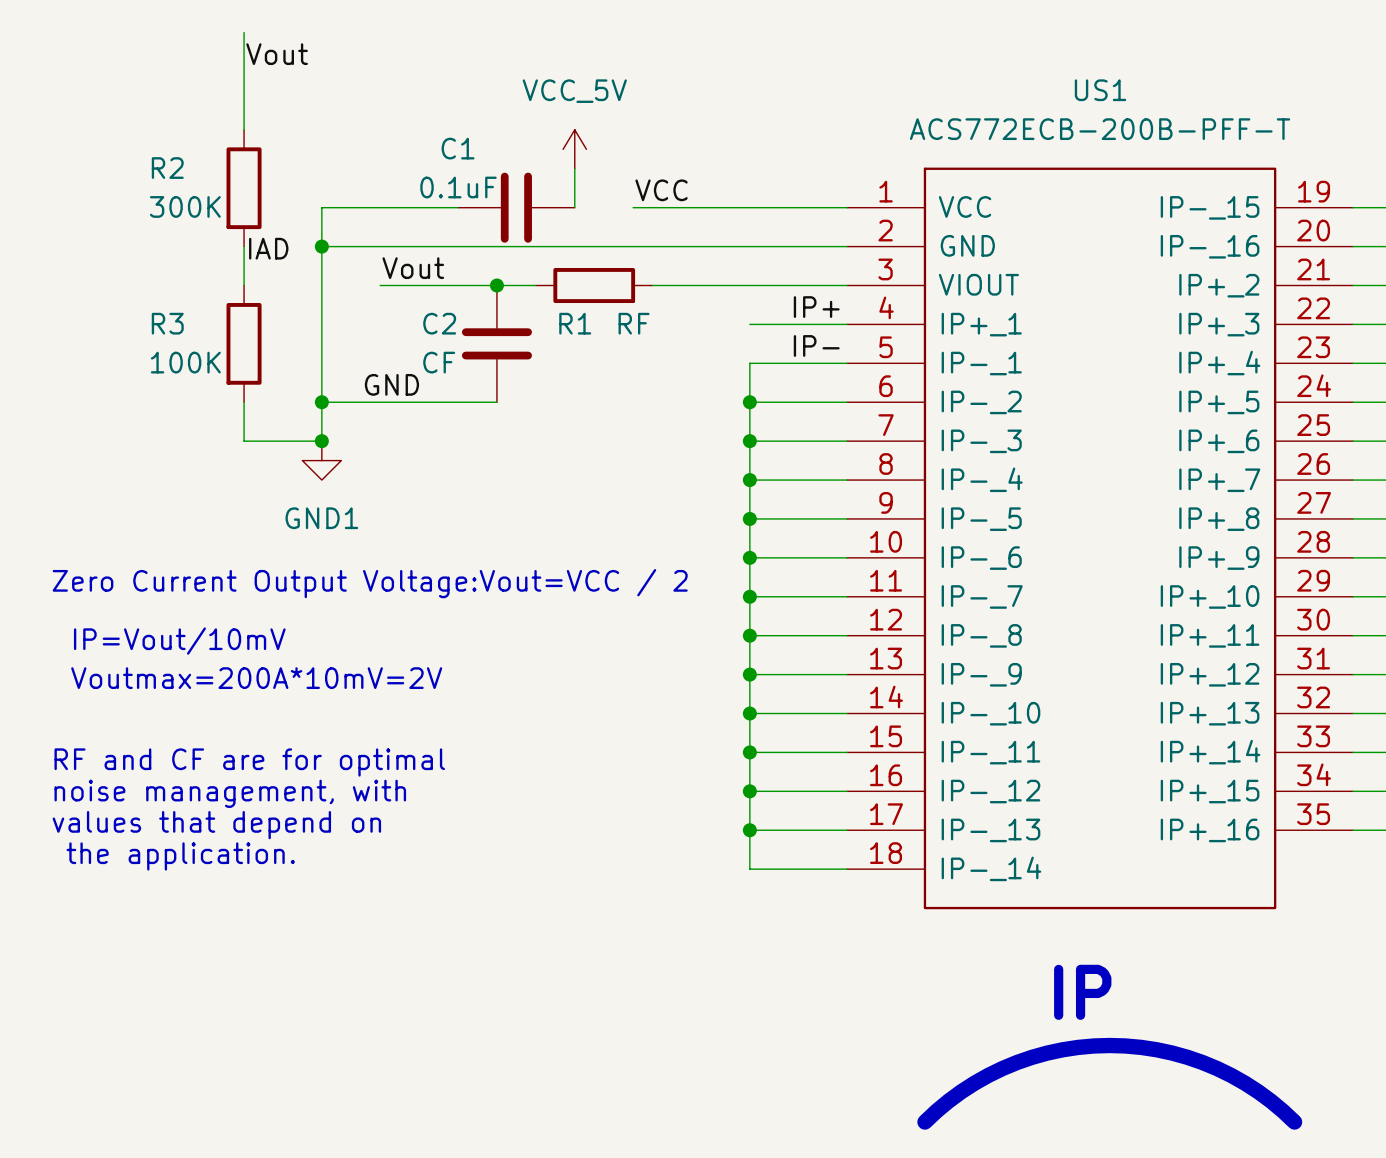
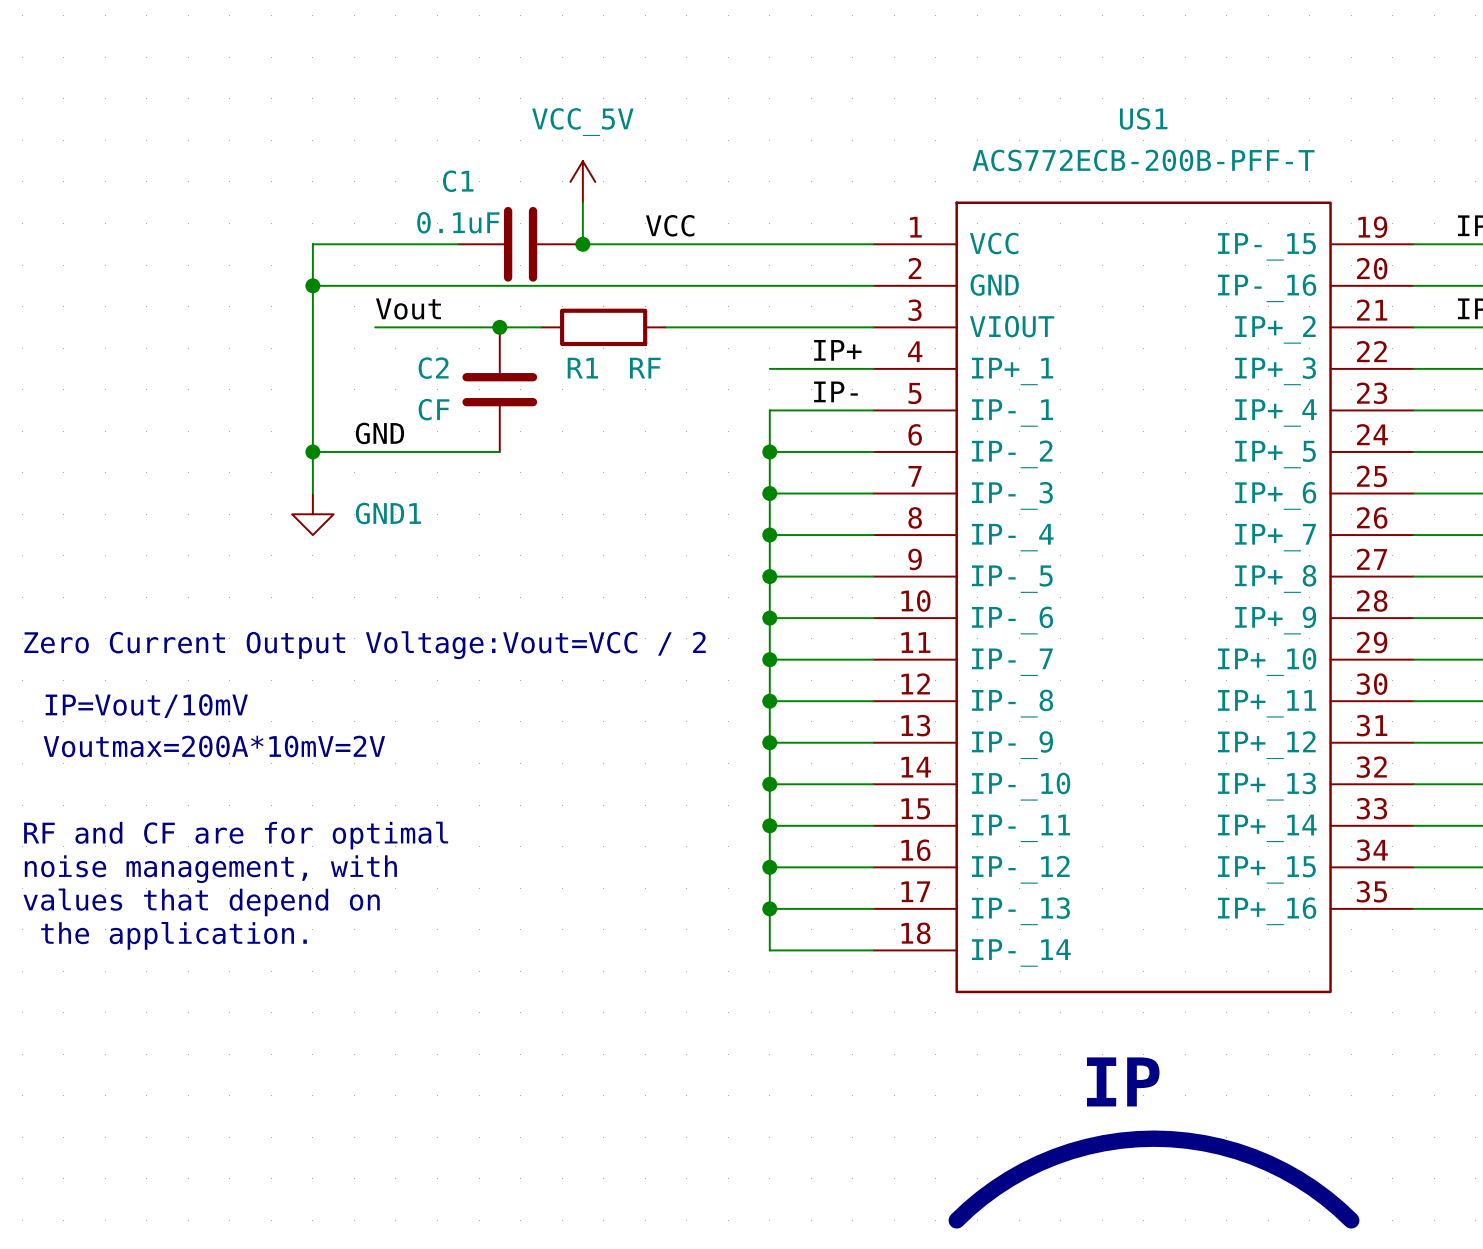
wire: (244, 32) (244, 129) -> none
label: Vout (277, 54) -> none
R2: 300K (244, 188) -> none
wire: none -> (582, 244) (645, 244)
junction: none -> (582, 244)
wire: (244, 246) (244, 285) -> none
label: IAD (268, 248) -> none
R3: 100K (244, 343) -> none
wire: (244, 402) (244, 441) (321, 441) -> none
junction: (321, 441) -> none
power symbol text position: GND1 (321, 518) -> GND1 (388, 513)

